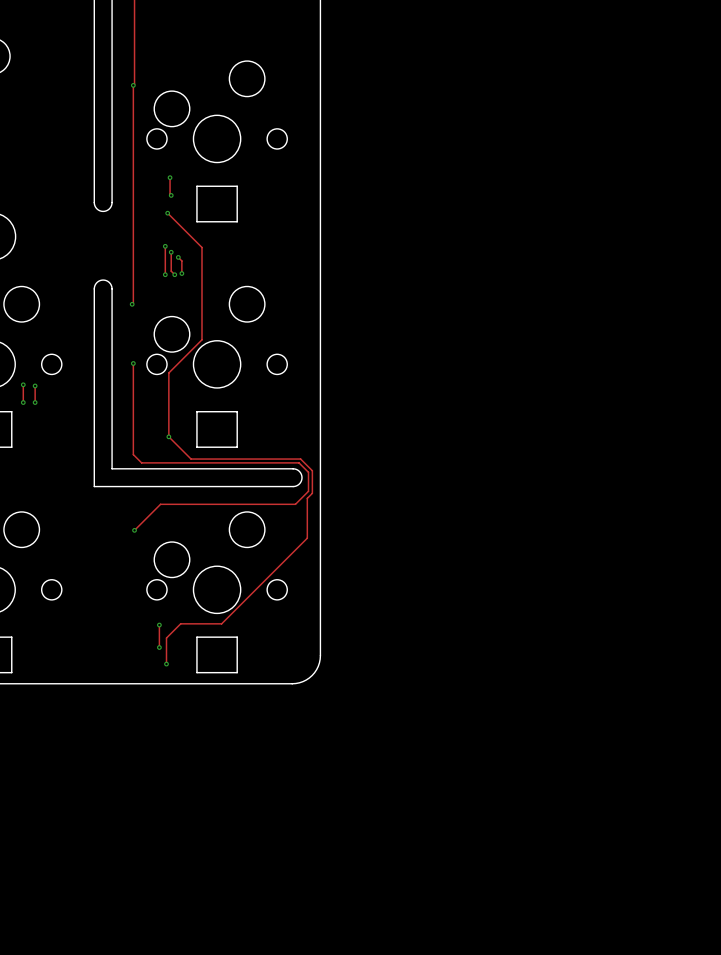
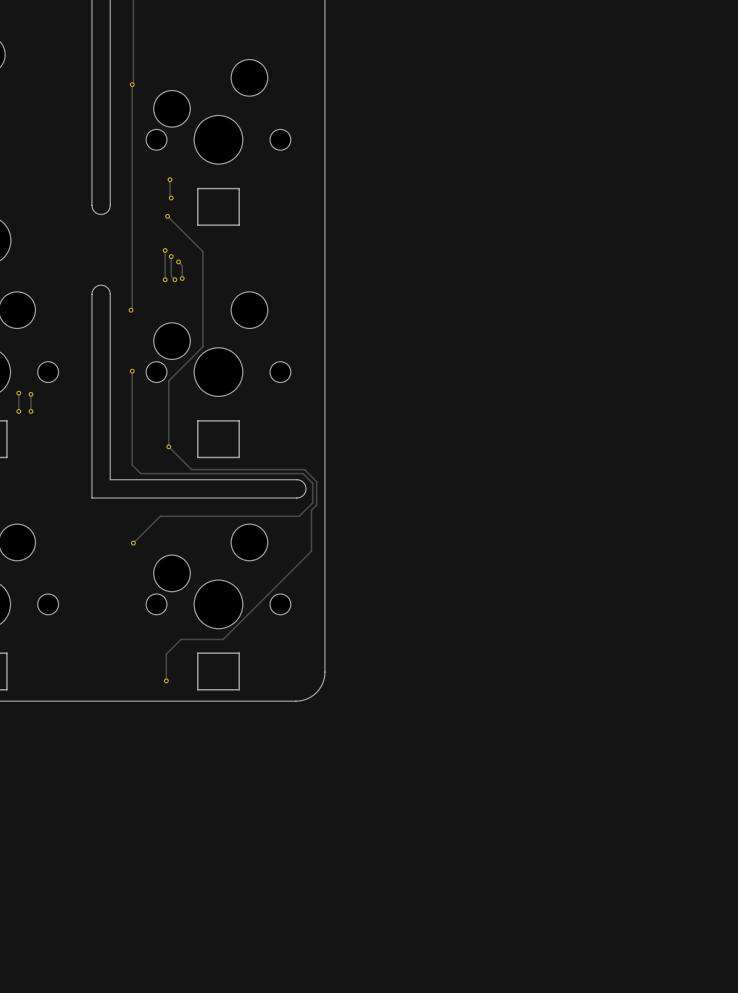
track: (159, 625) (159, 647) -> none
via: (159, 625) -> none
via: (159, 647) -> none

